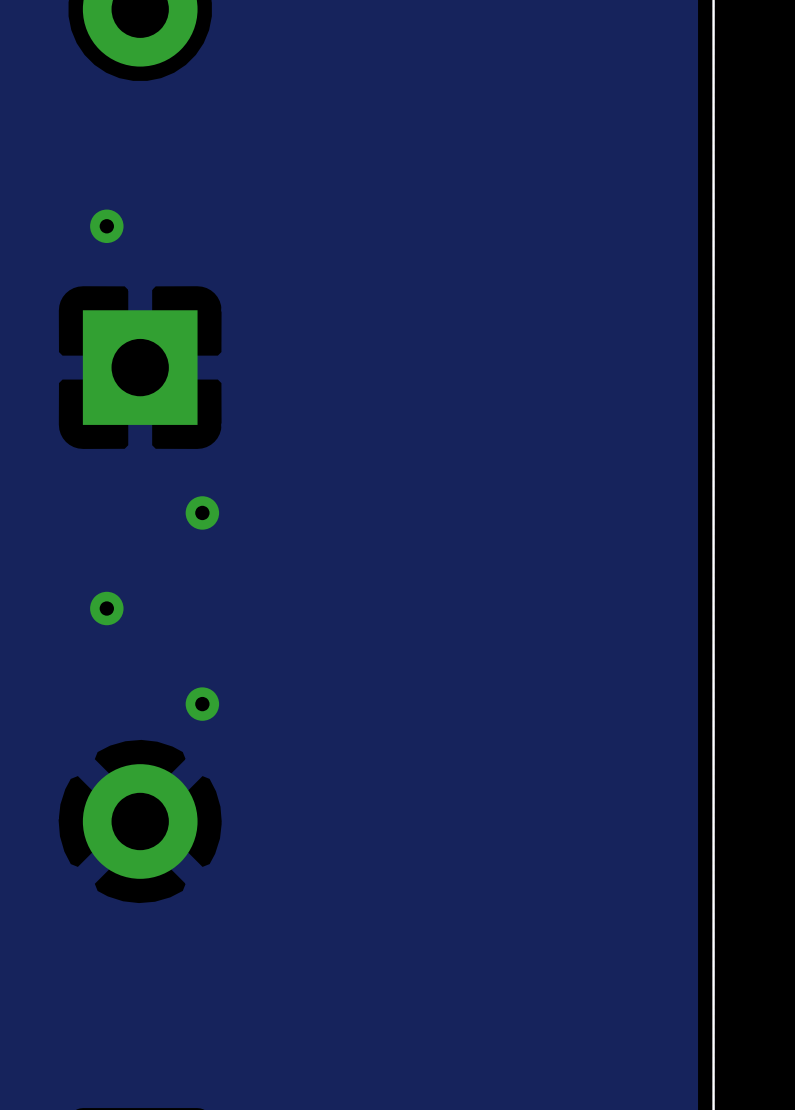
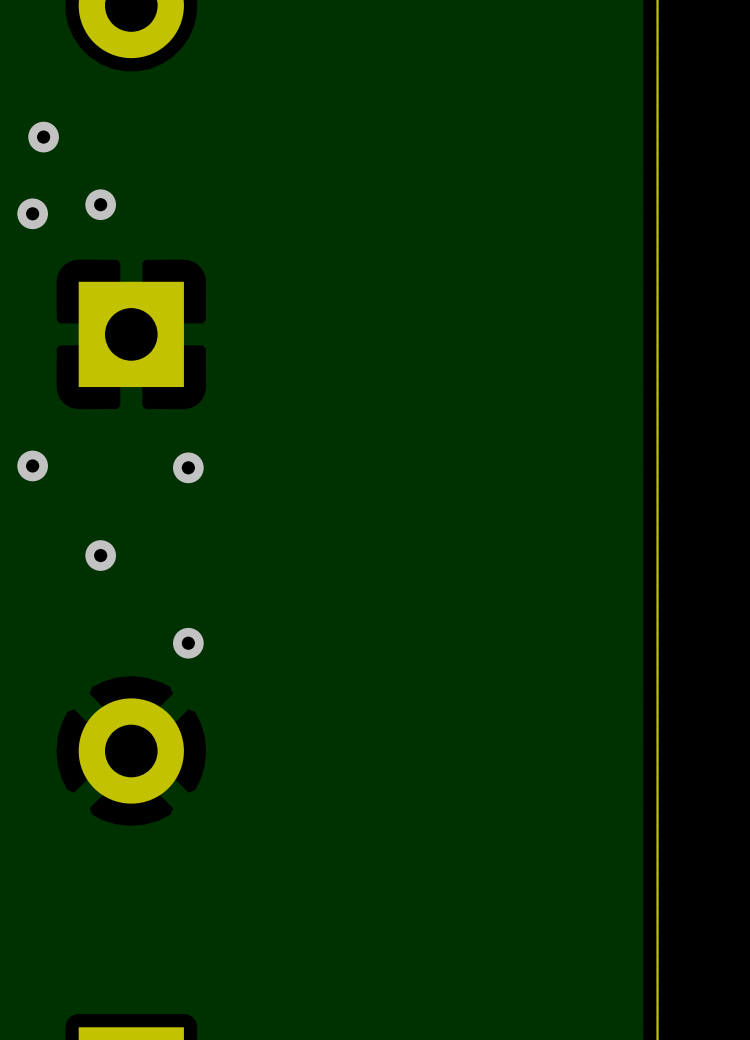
via: none -> (43, 137)
via: none -> (32, 213)
via: none -> (32, 465)

